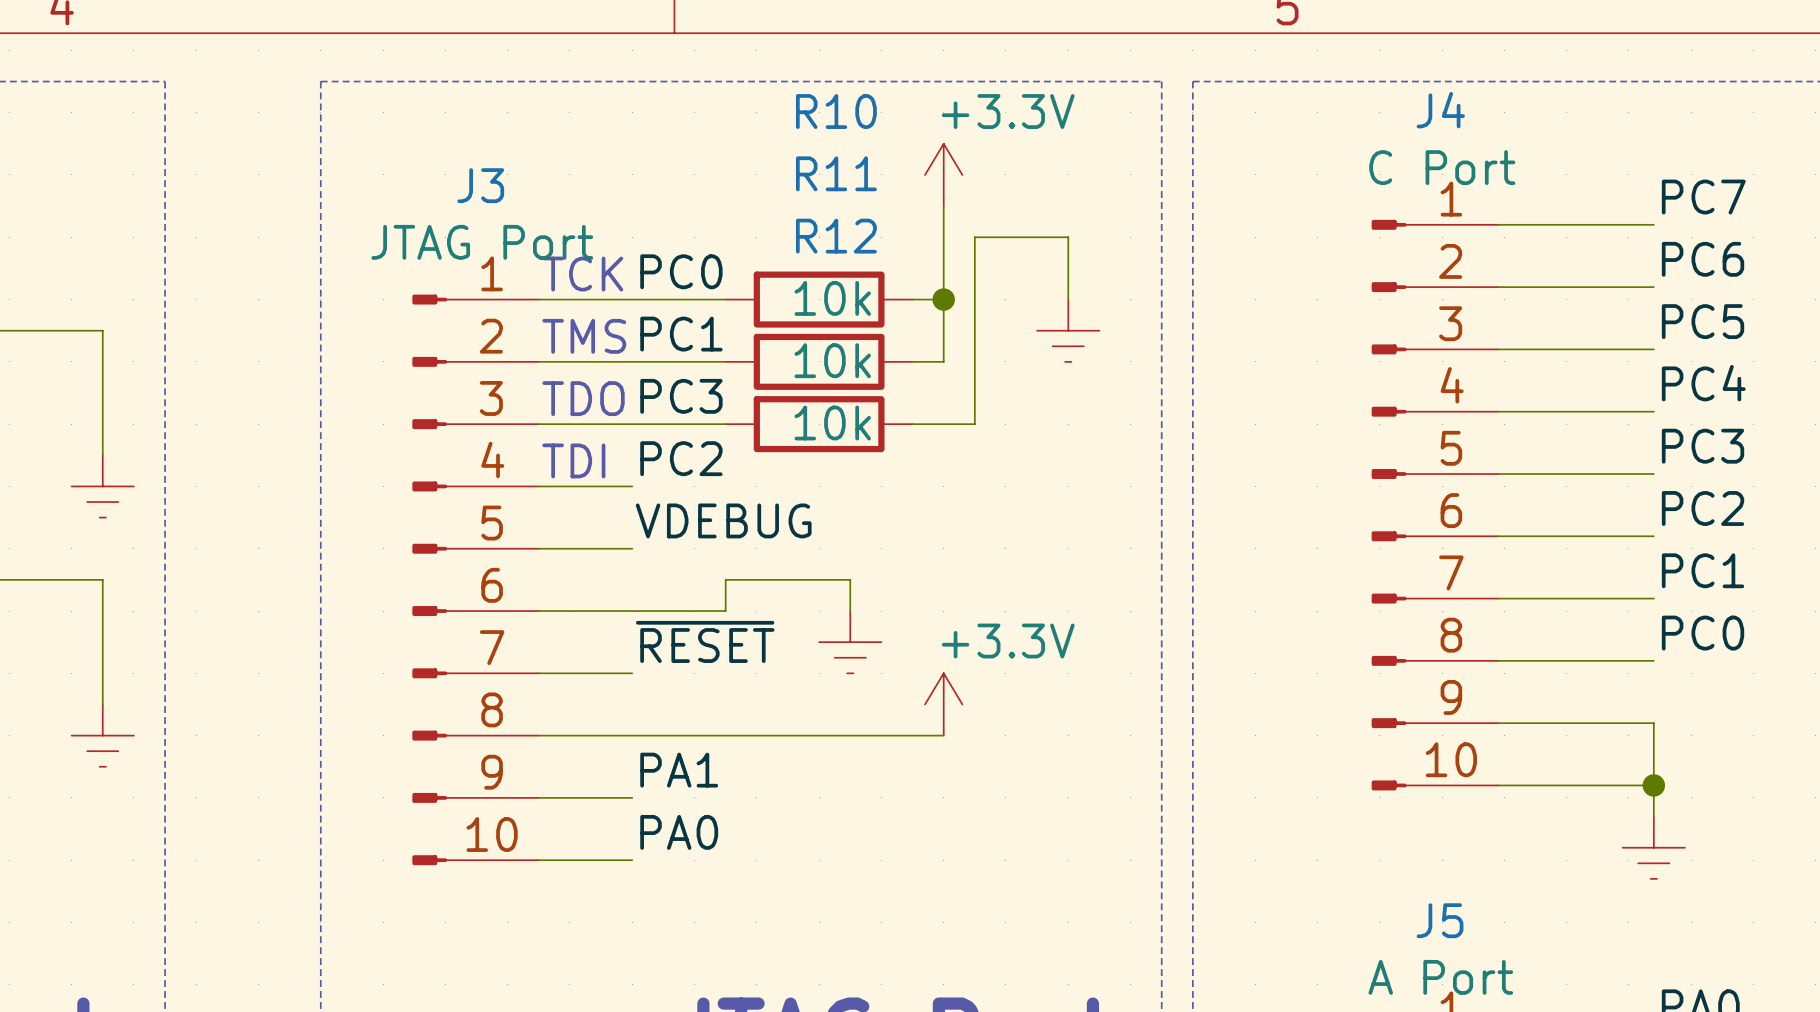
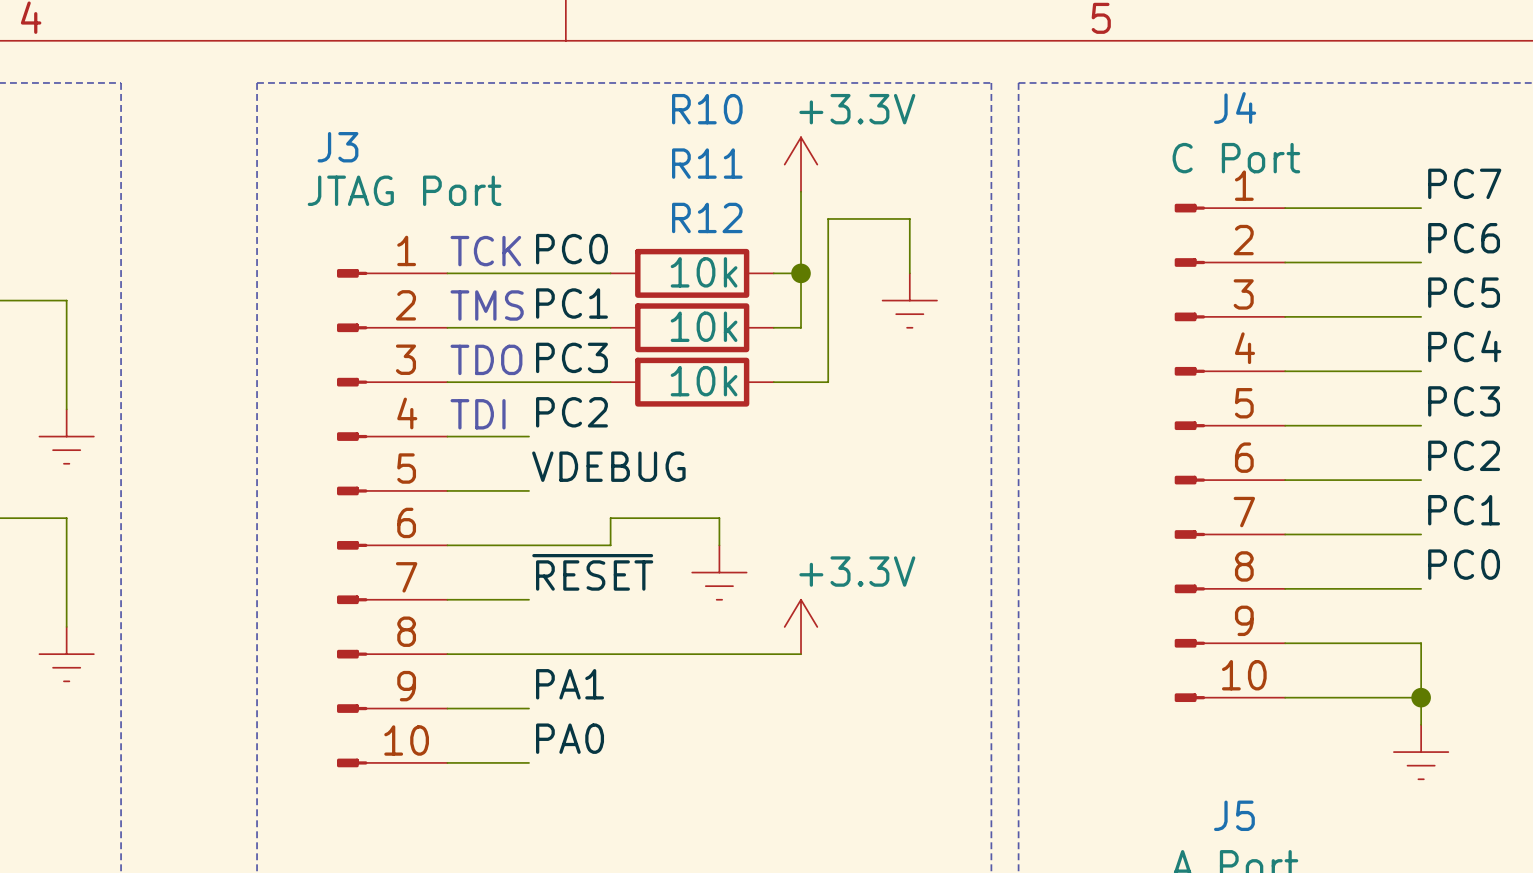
J3 name position: J3 (480, 185) -> J3 (337, 147)
J3 value position: JTAG Port (482, 242) -> JTAG Port (404, 190)

